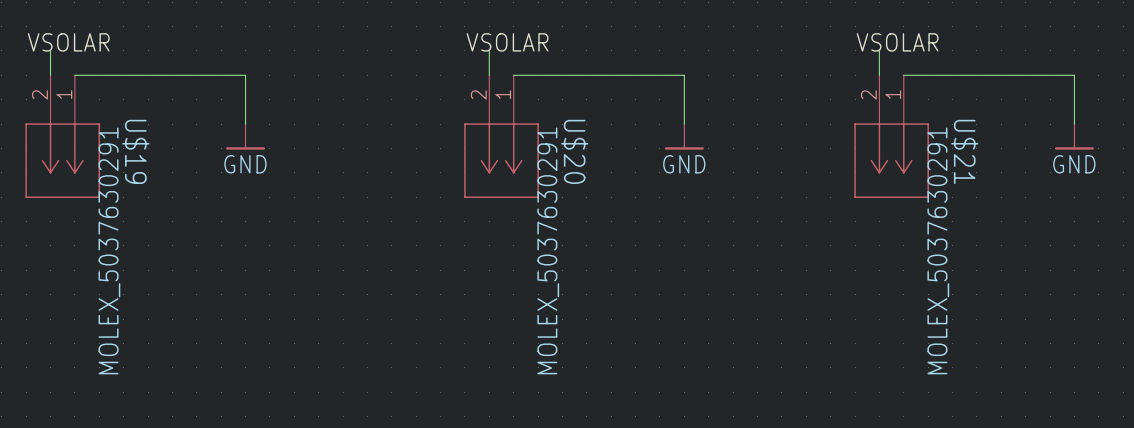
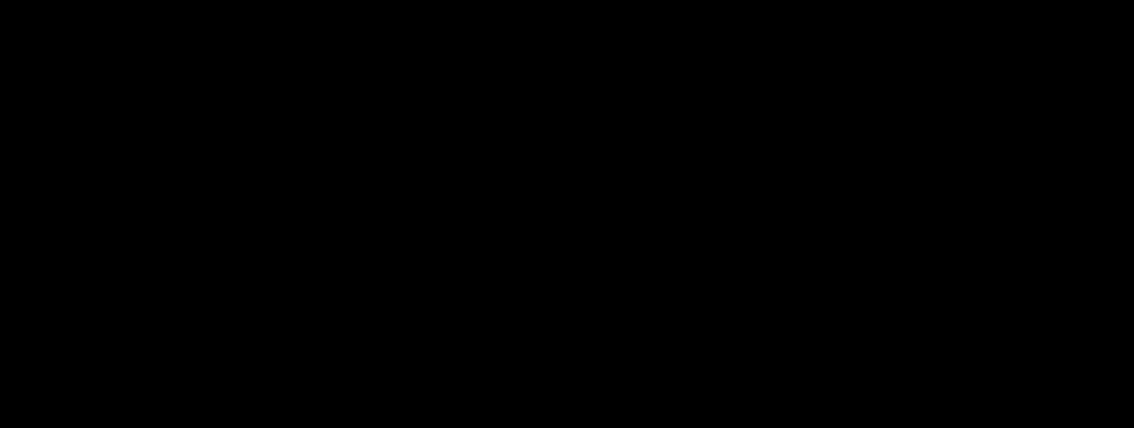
label: VSOLAR (68, 42) -> none
label: VSOLAR (507, 42) -> none
label: VSOLAR (897, 42) -> none
wire: (50, 50) (50, 75) -> none
wire: (489, 50) (489, 75) -> none
wire: (879, 50) (879, 75) -> none
wire: (74, 75) (245, 75) (245, 124) -> none
wire: (513, 75) (684, 75) (684, 124) -> none
wire: (903, 75) (1074, 75) (1074, 124) -> none
U$19: MOLEX_5037630291 (62, 136) -> none
power symbol: GND (245, 136) -> none
U$20: MOLEX_5037630291 (501, 136) -> none
power symbol: GND (684, 136) -> none
U$21: MOLEX_5037630291 (891, 136) -> none
power symbol: GND (1074, 136) -> none

